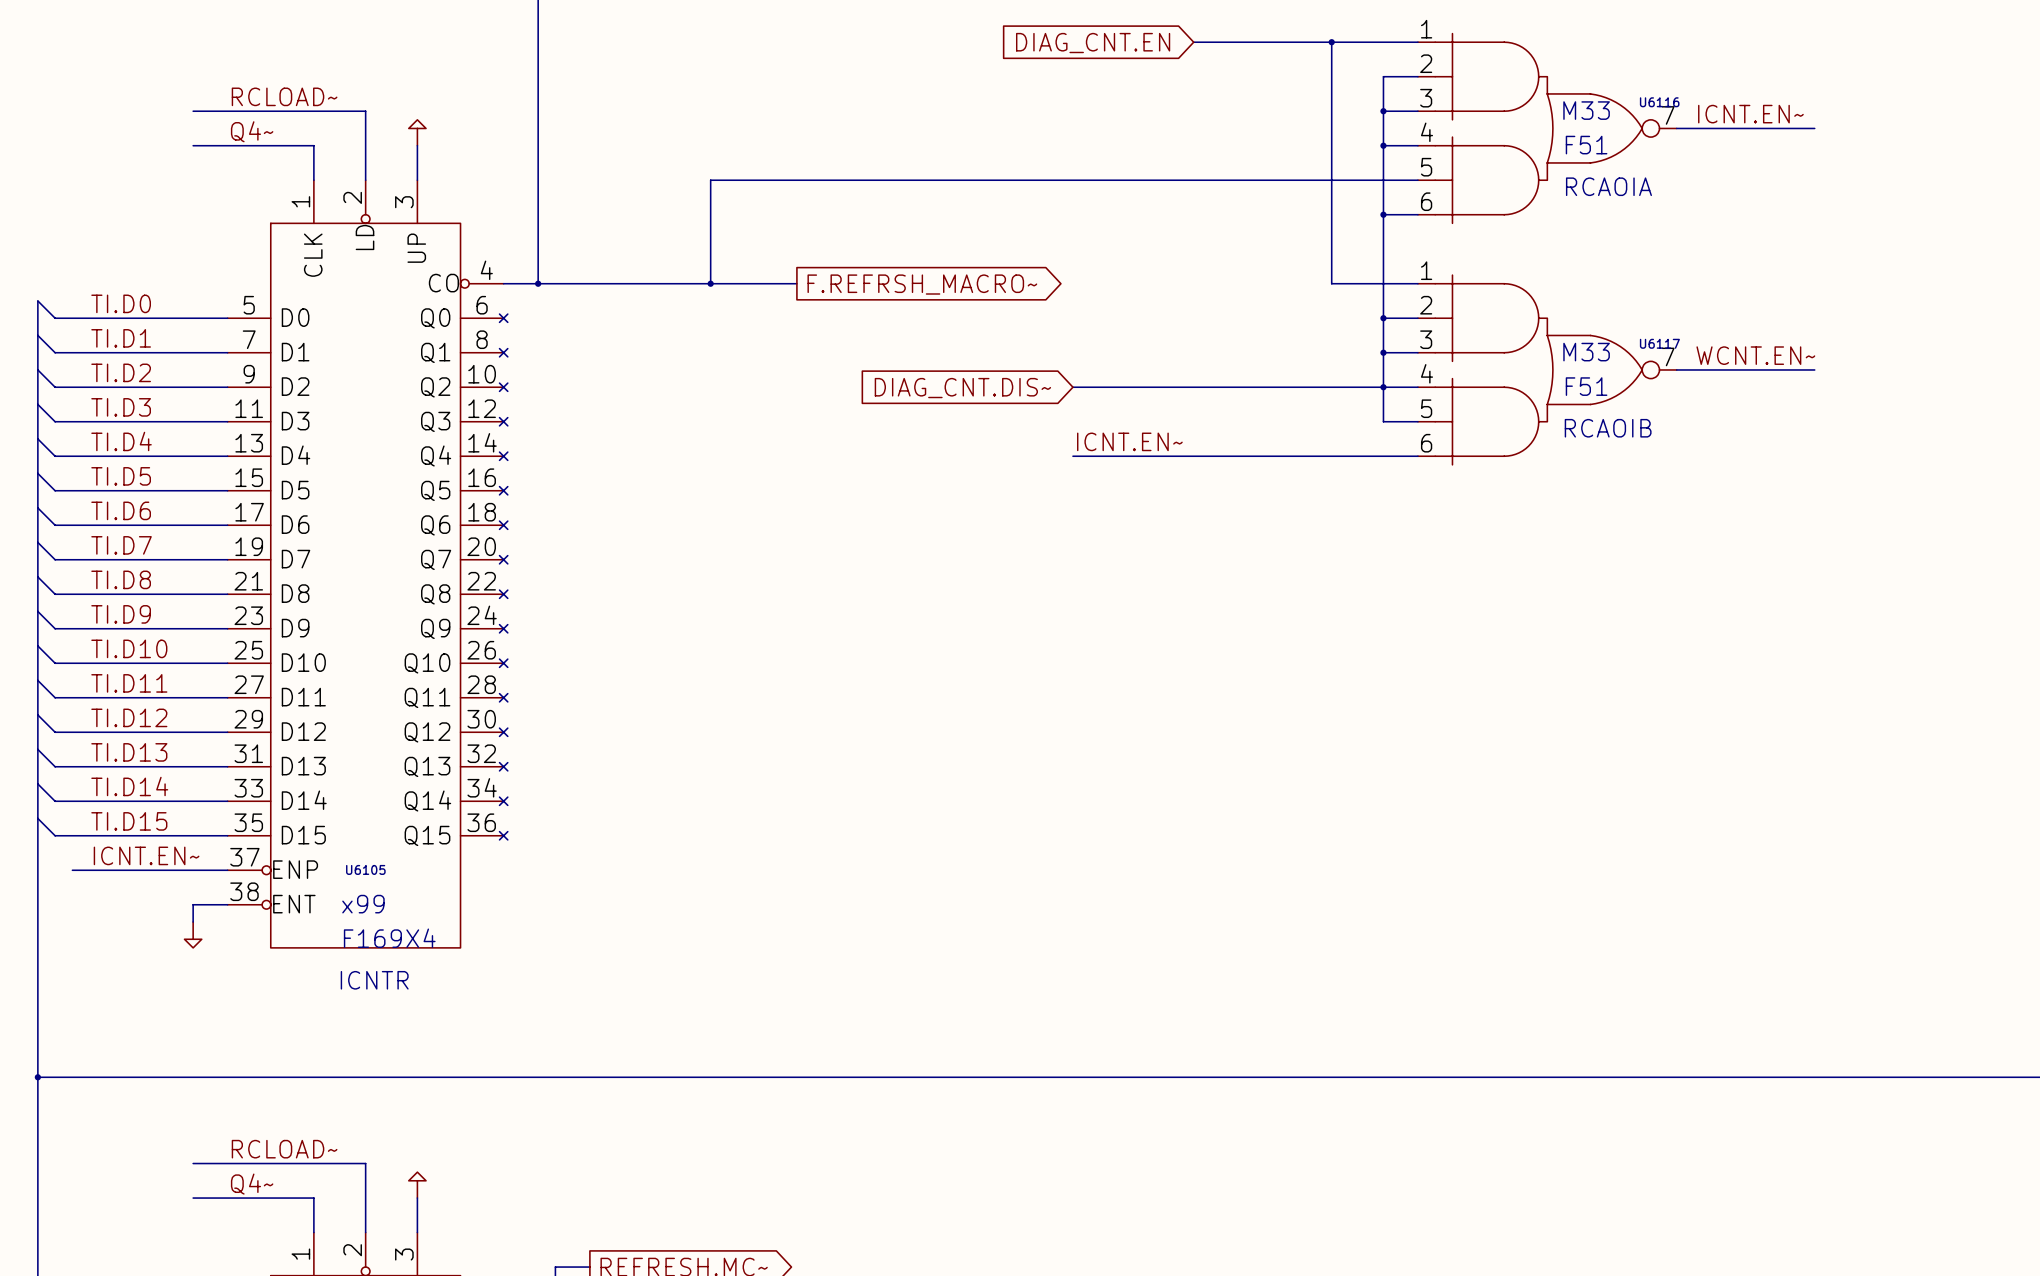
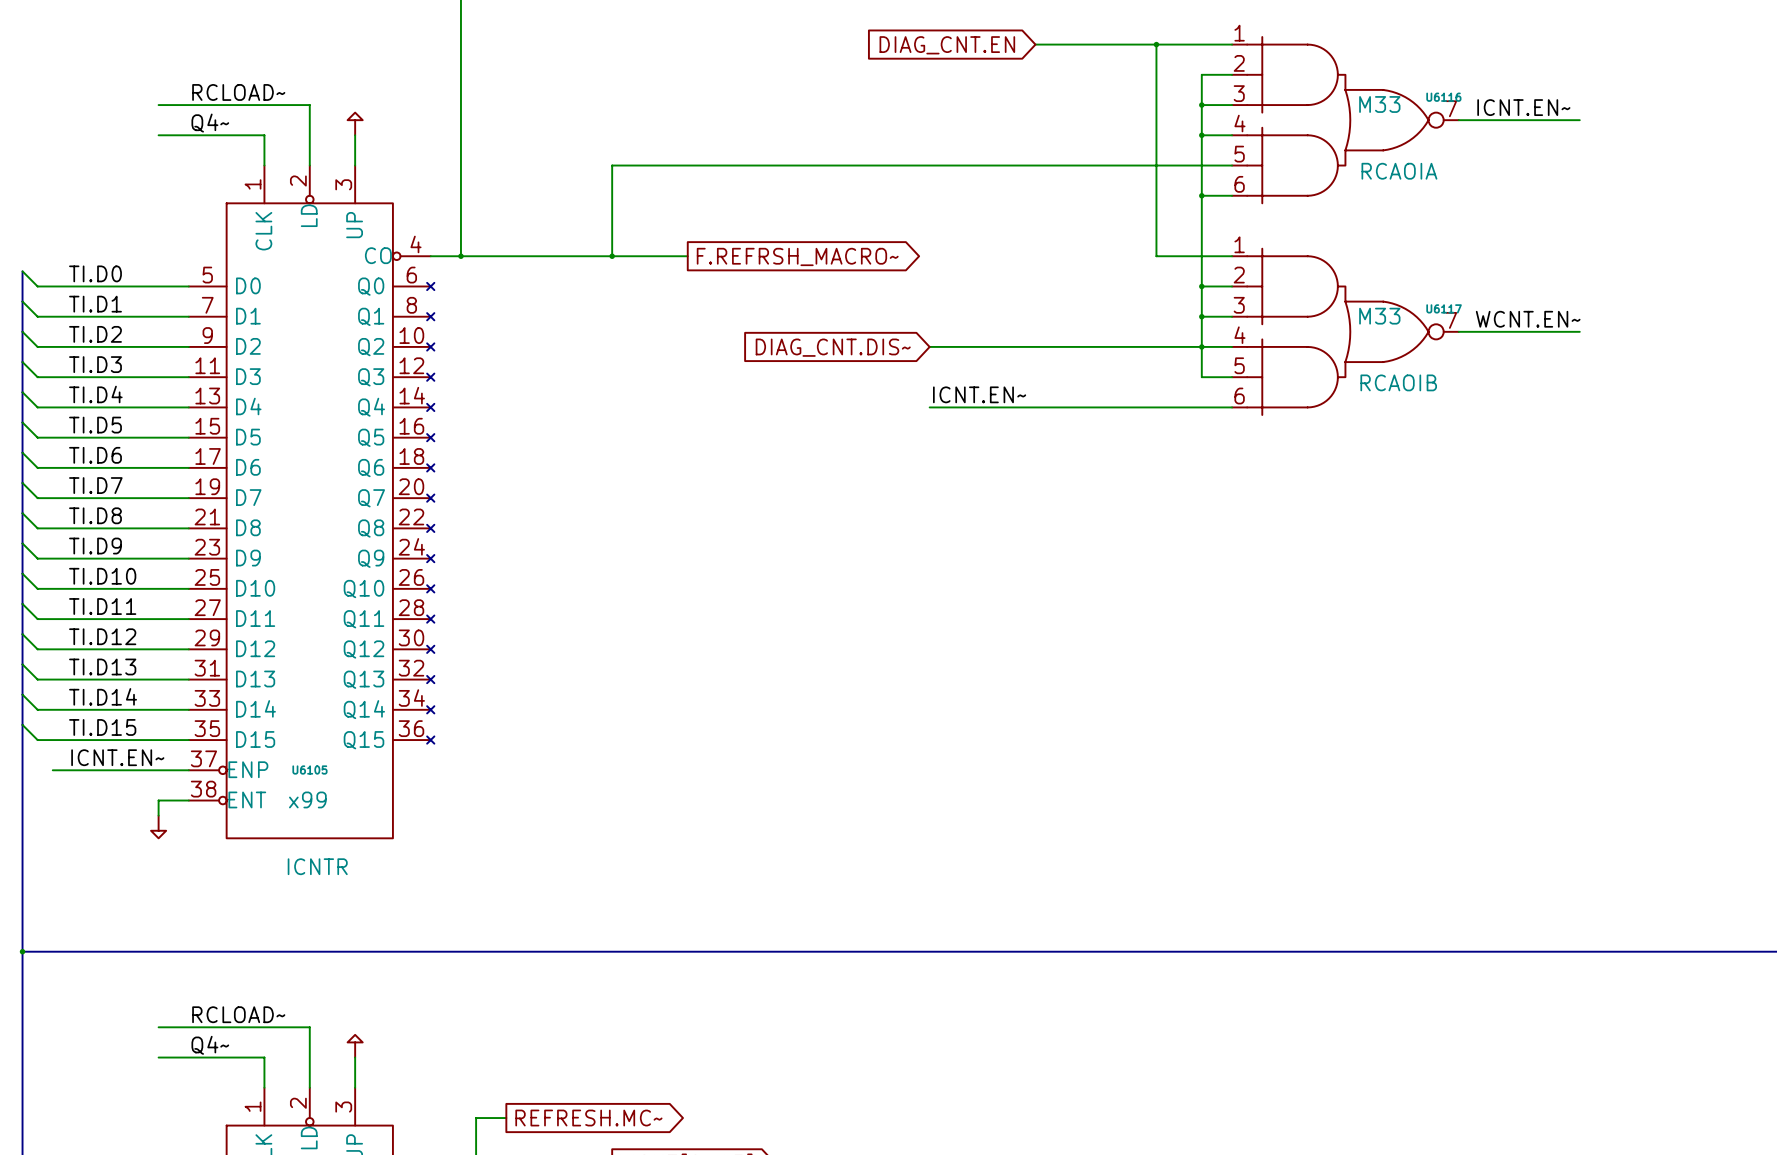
U6116 value: F51 (1586, 145) -> none
U6117 value: F51 (1586, 386) -> none
U6105 value: F169X4 (389, 938) -> none

